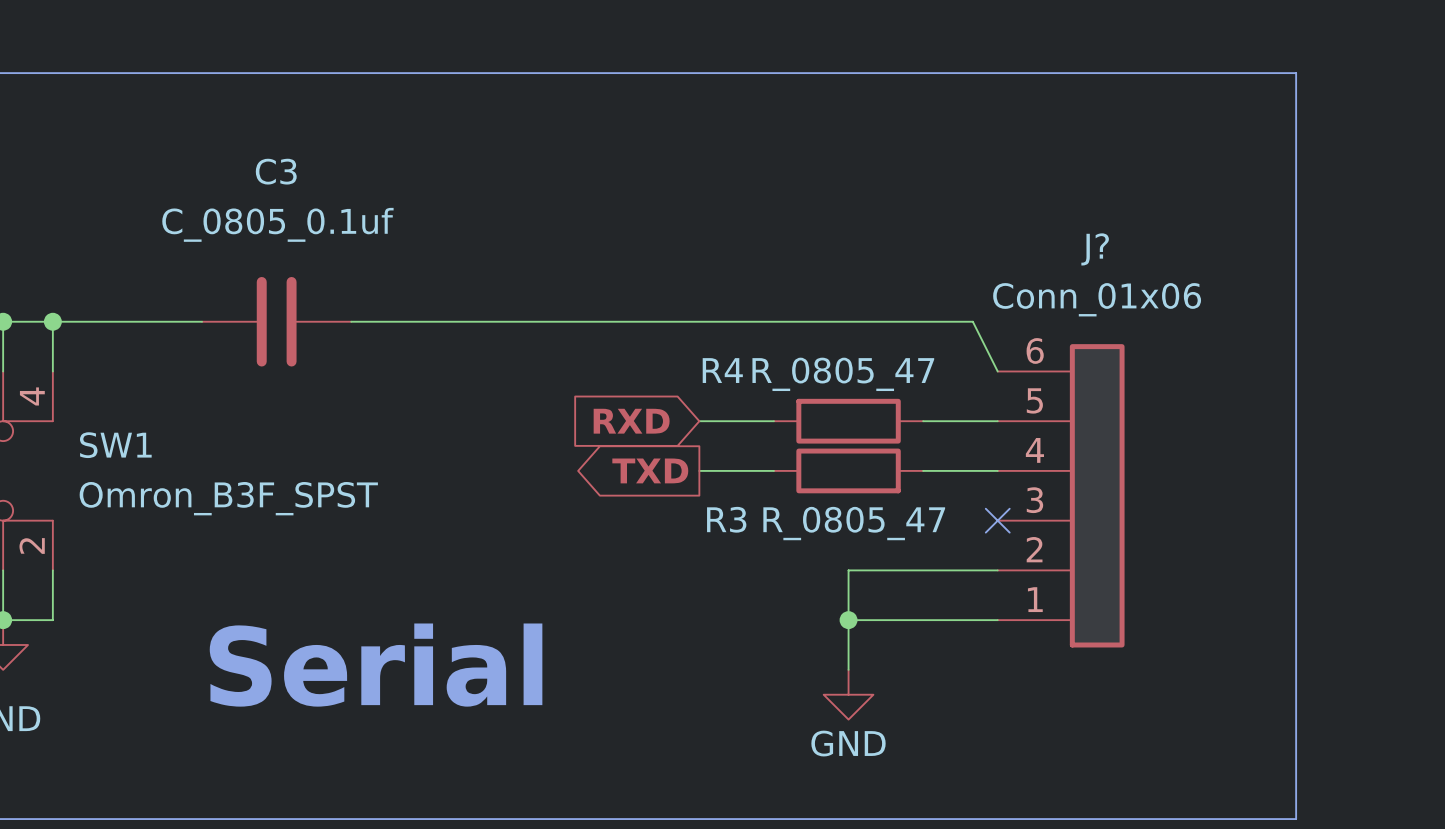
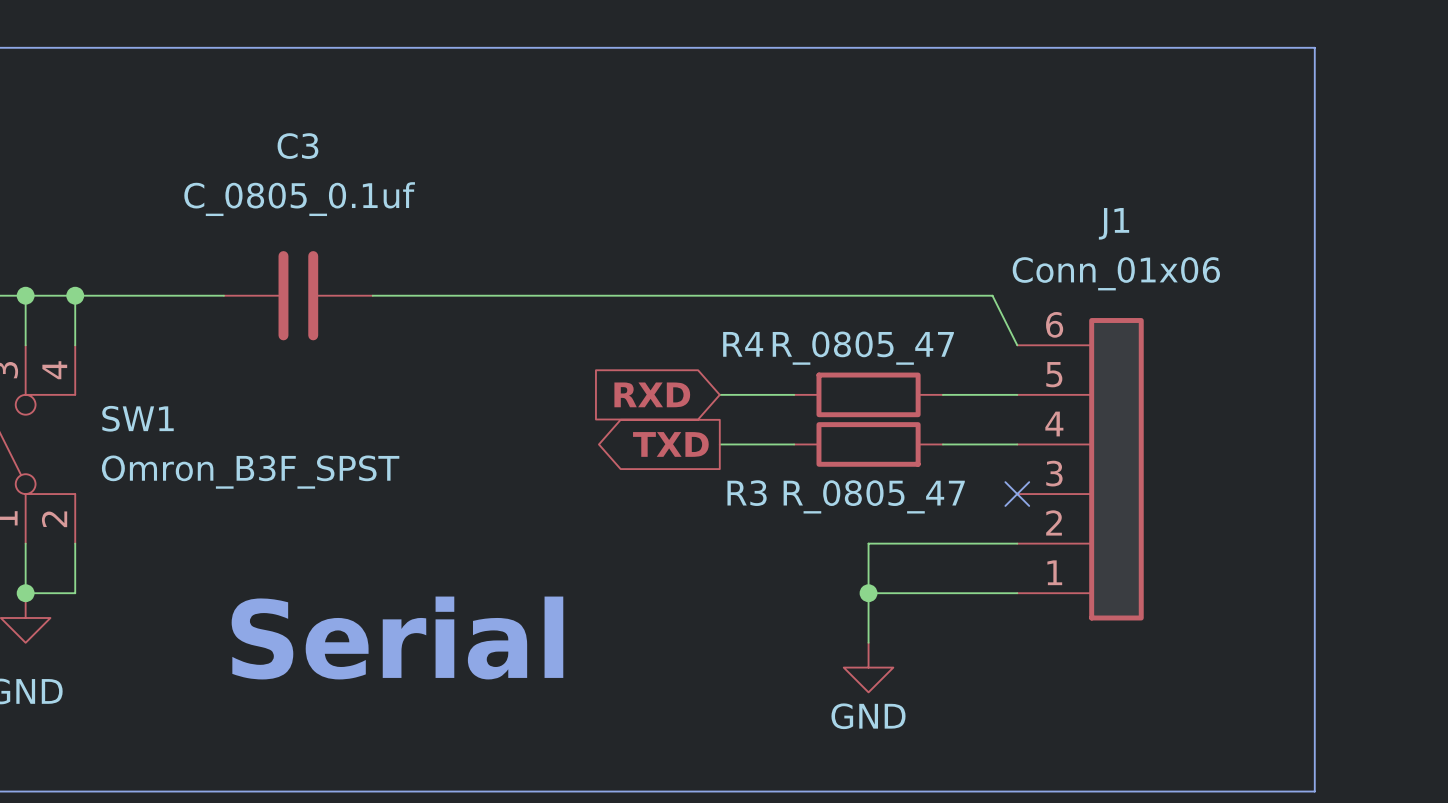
J? name: J? (1095, 249) -> J1 (1114, 223)

